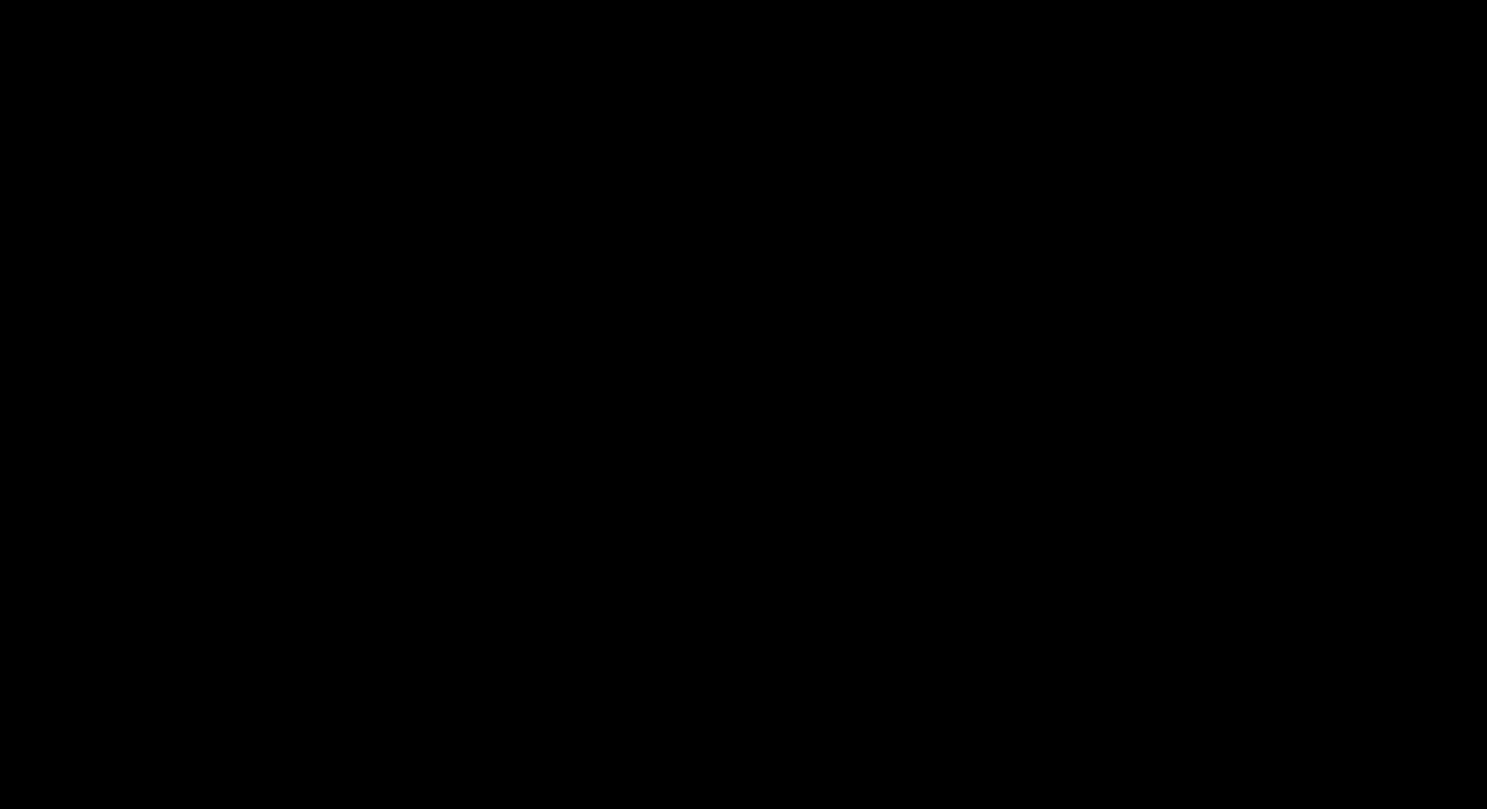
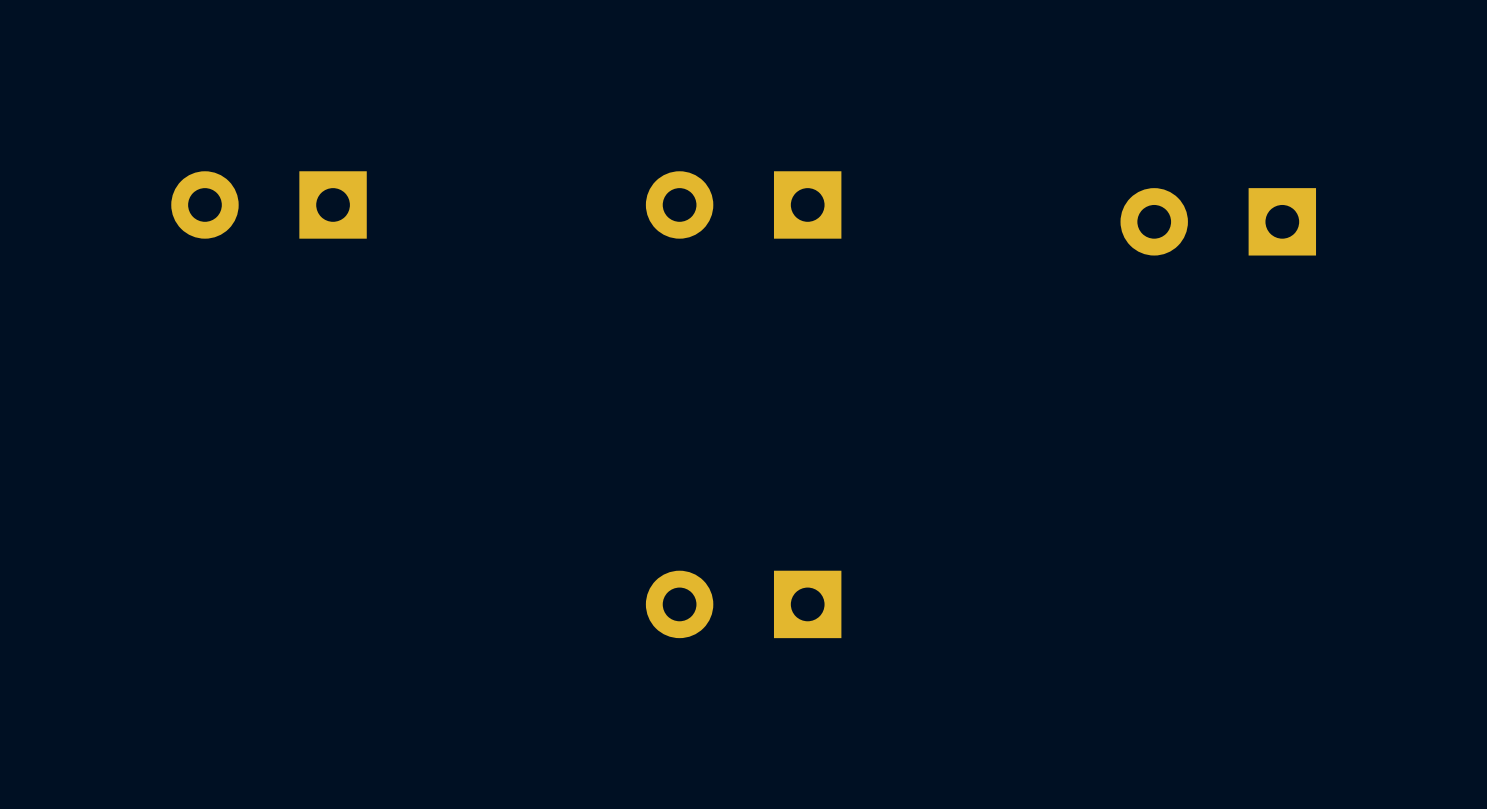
part: none -> (269, 204)
part: none -> (743, 204)
part: none -> (1218, 221)
part: none -> (743, 604)

